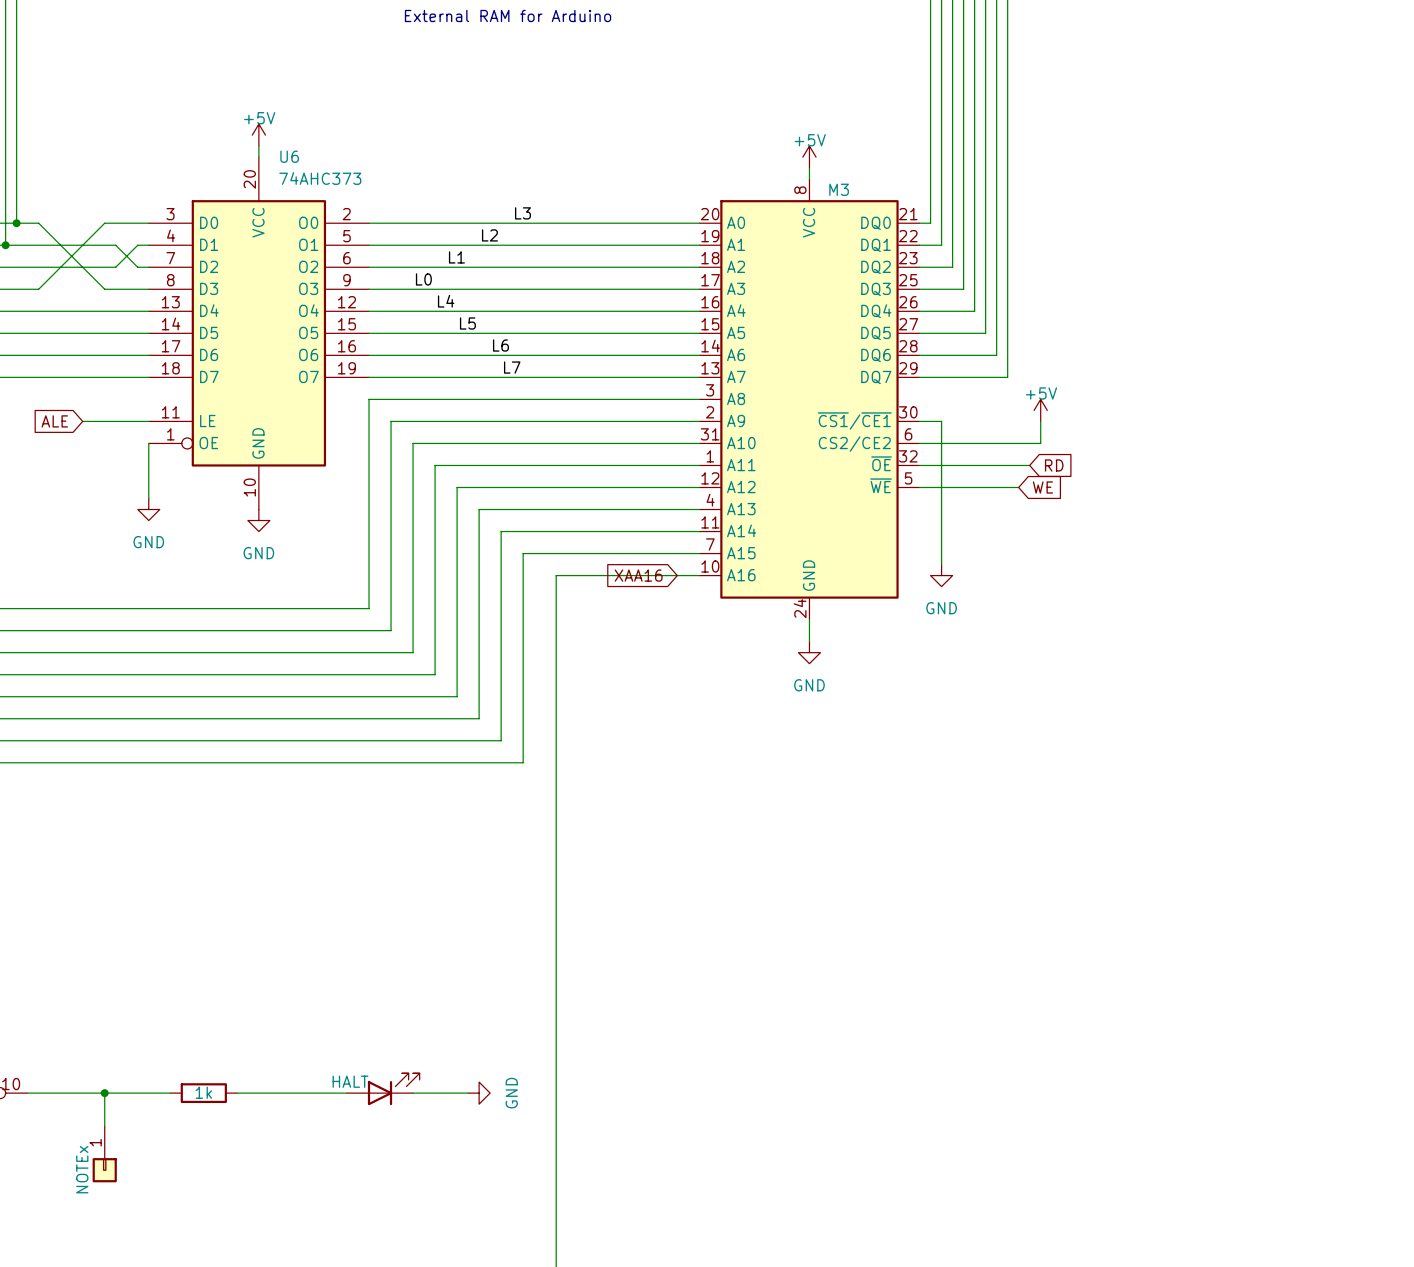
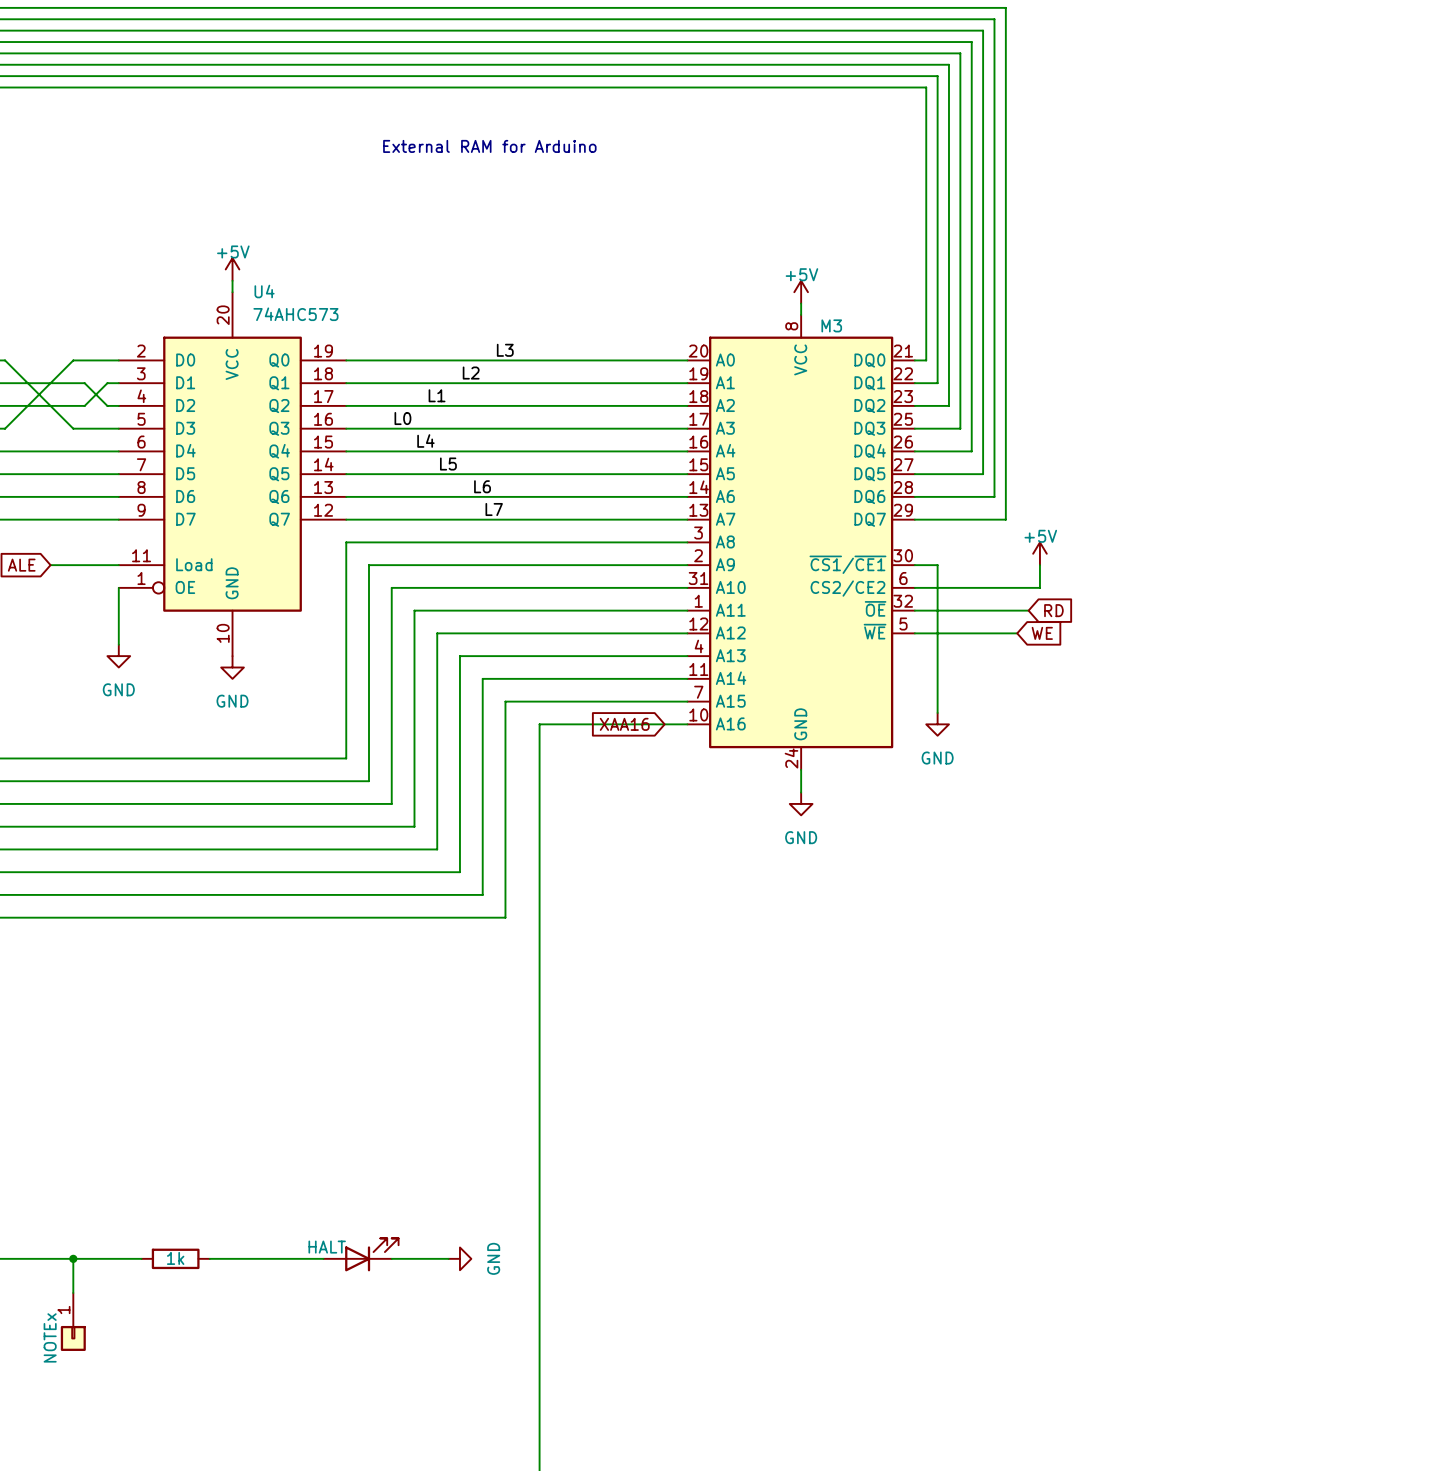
U6 name: U6 (289, 156) -> U4 (264, 291)
U6 symbol: [148, 157, 370, 510] -> [118, 292, 347, 657]
U6 value: 74AHC373 (320, 178) -> 74AHC573 (295, 314)

